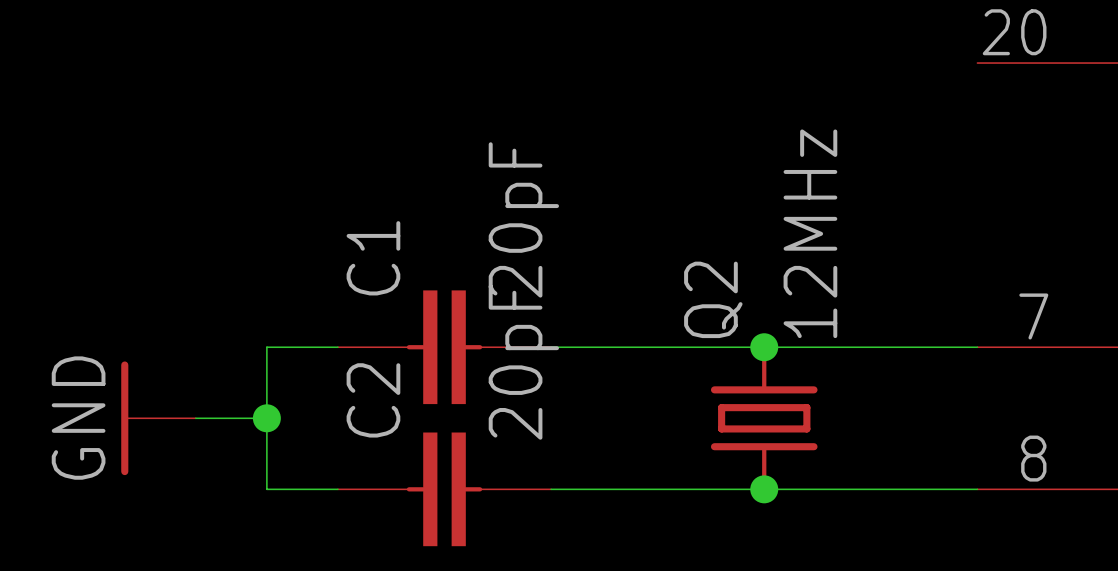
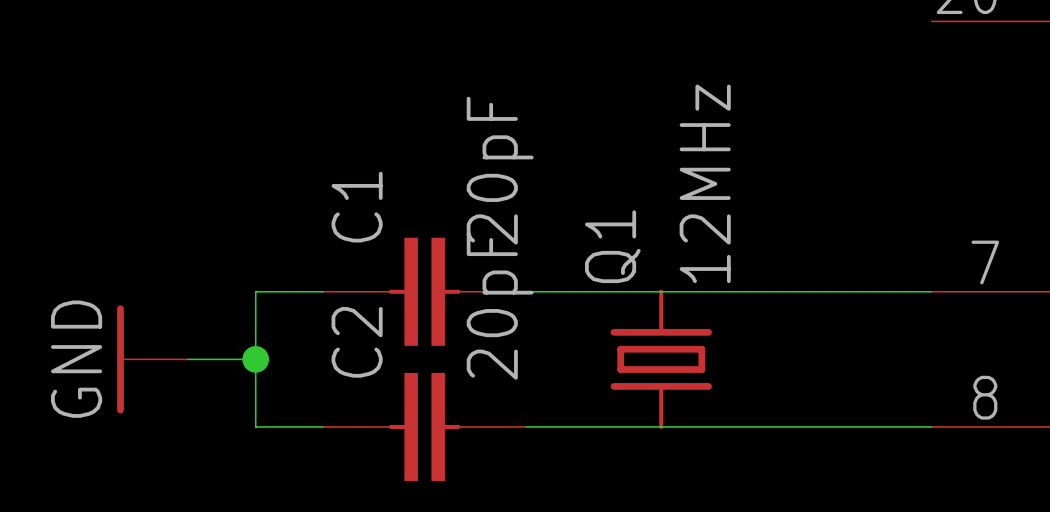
junction: (764, 347) -> none
Q1: none -> 12MHz (661, 359)
Q2: 12MHz (764, 418) -> none
junction: (764, 489) -> none

